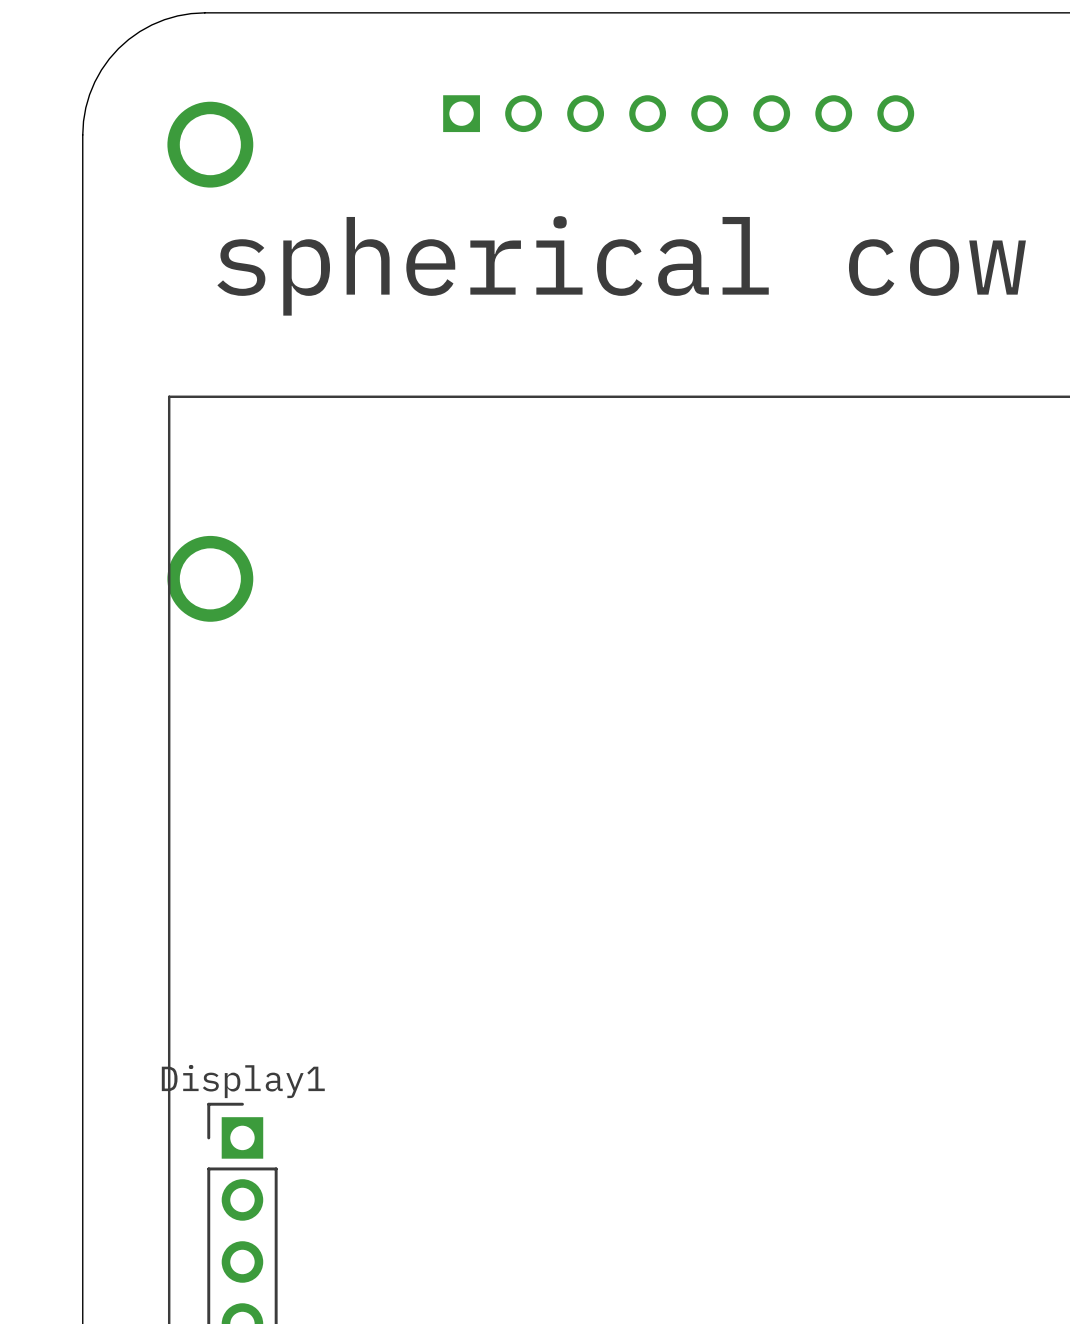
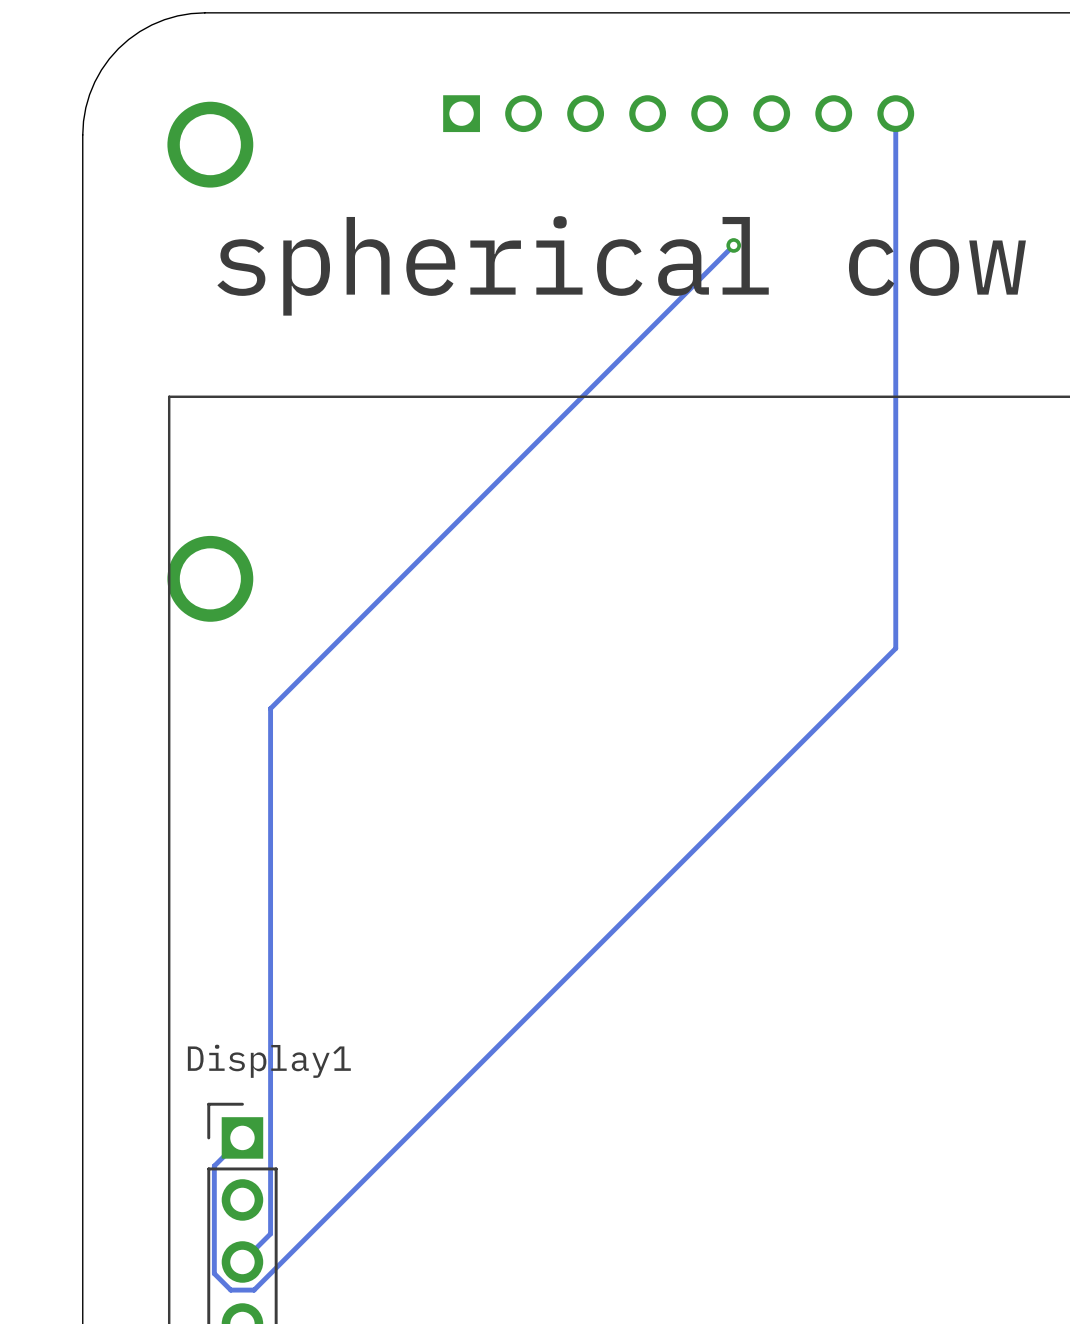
track: none -> (895, 113) (895, 648) (254, 1290) (230, 1290) (214, 1273) (214, 1166) (242, 1137)
track: none -> (733, 245) (270, 708) (270, 1233) (242, 1261)
via: none -> (733, 245)
Display1 name position: Display1 (243, 1081) -> Display1 (269, 1061)

